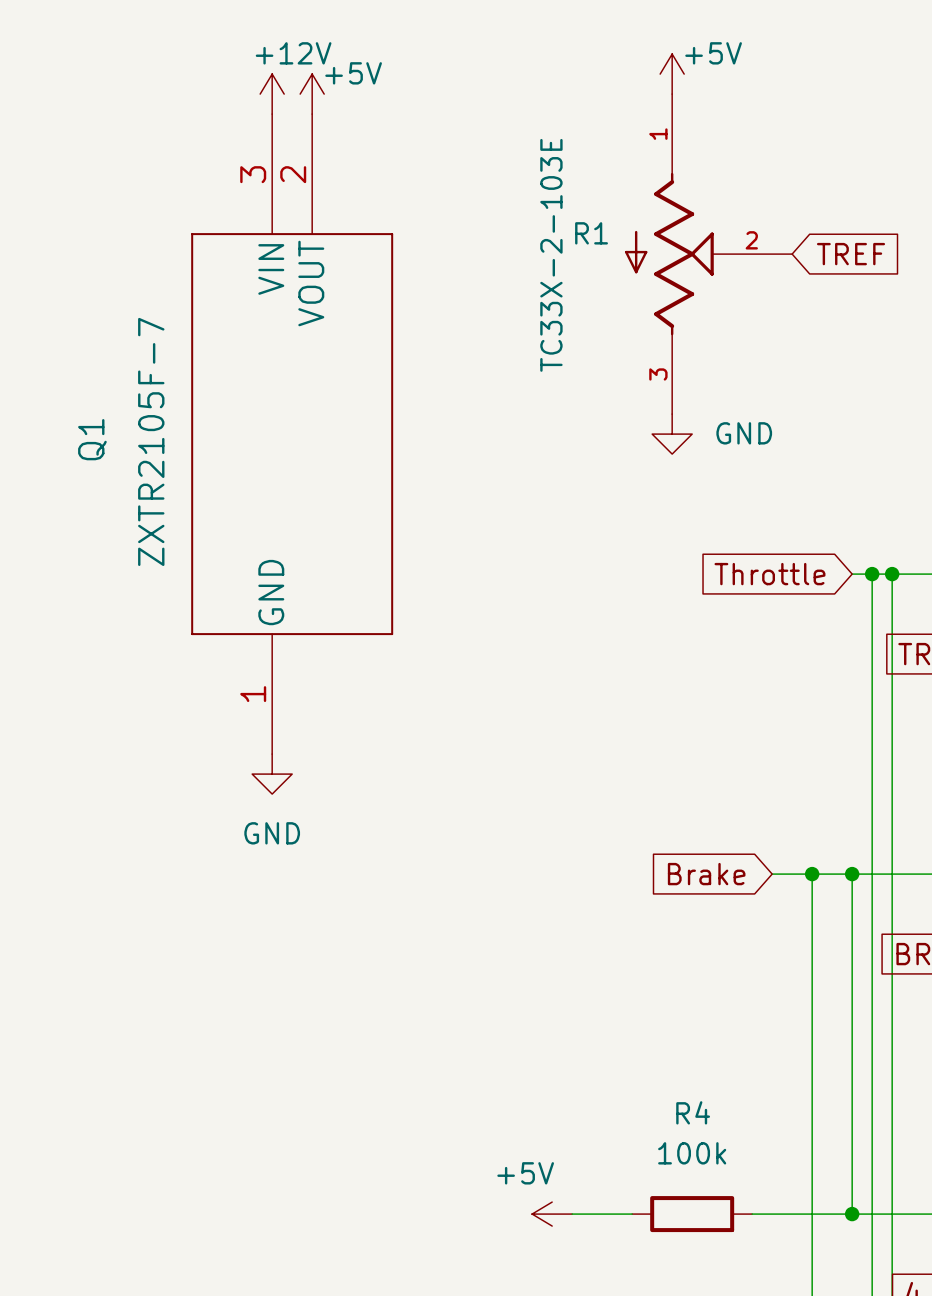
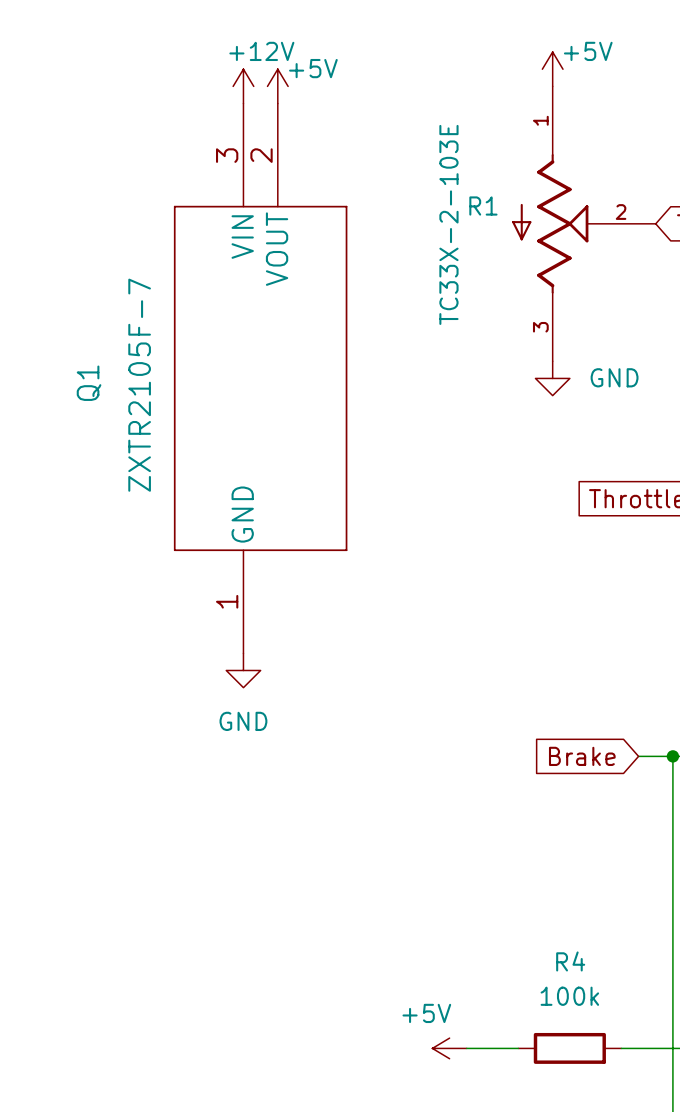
power symbol: +12V (272, 94) -> none
power symbol: +5V (312, 94) -> +12V (243, 86)
power symbol: none -> +5V (277, 86)
Q1 position: (292, 434) -> (260, 378)
power symbol position: GND (272, 774) -> GND (243, 670)

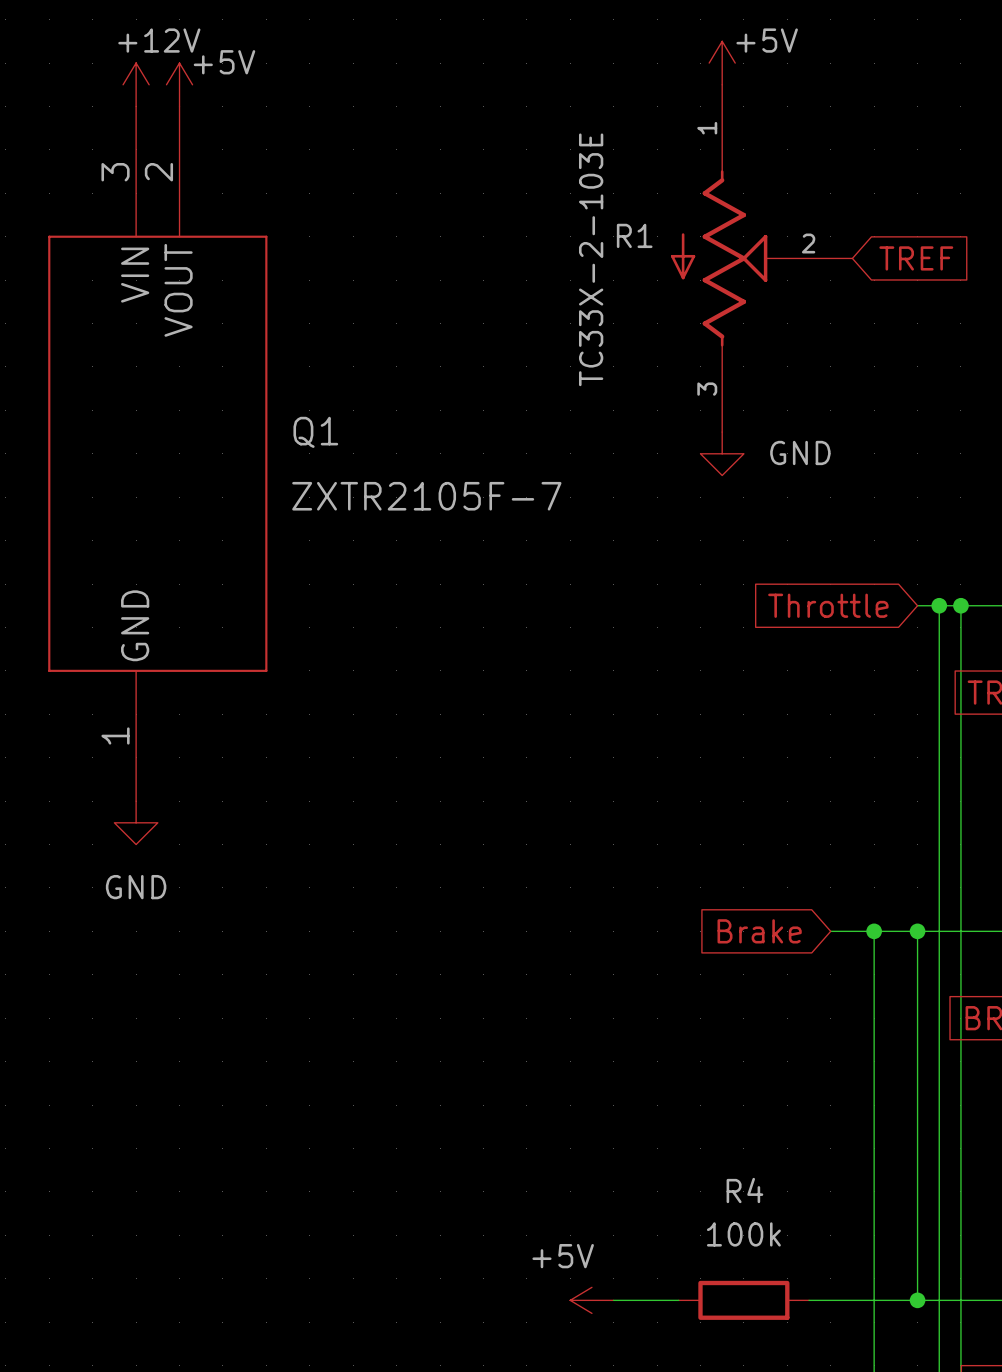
power symbol position: +12V (243, 86) -> +12V (136, 84)
power symbol position: +5V (277, 86) -> +5V (179, 84)
Q1 position: (260, 378) -> (157, 453)
Q1 name rotation: 0° (89, 383) -> 90° clockwise (315, 432)
Q1 name position: Q1 (89, 383) -> Q1 (315, 432)
Q1 value rotation: 0° (139, 385) -> 90° clockwise (426, 496)
power symbol position: GND (243, 670) -> GND (136, 822)

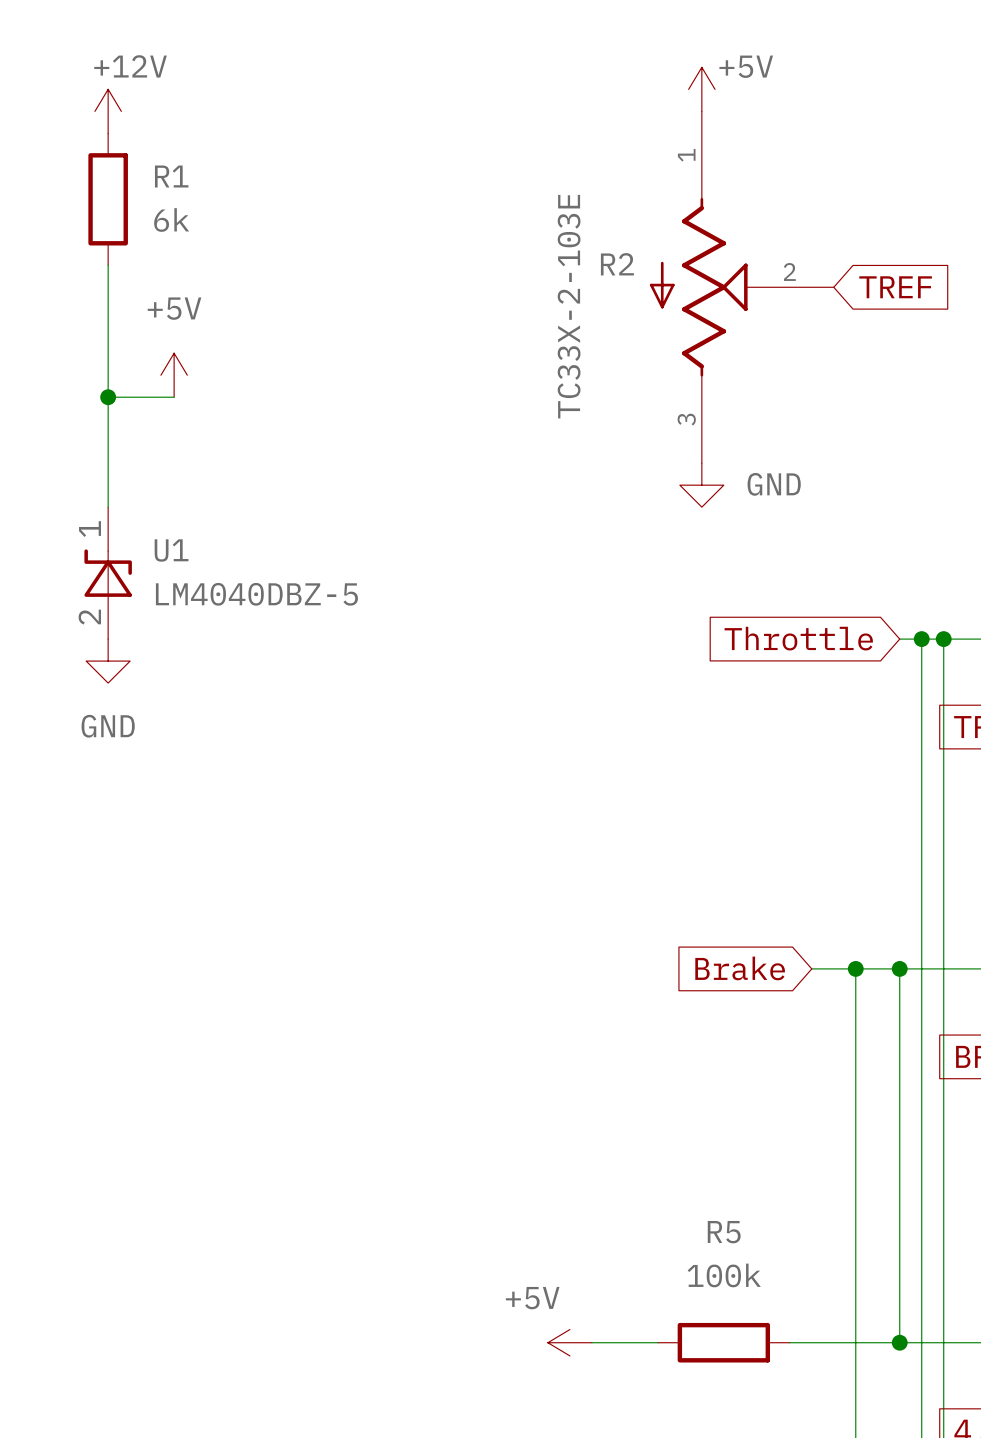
power symbol text position: +5V (224, 62) -> +5V (174, 308)
power symbol position: +5V (179, 84) -> +5V (174, 375)
R1: none -> 6k (108, 199)
R1 name: R1 (634, 235) -> R2 (617, 264)
wire: none -> (108, 265) (108, 507)
wire: none -> (108, 397) (174, 397)
junction: none -> (108, 397)
Q1: ZXTR2105F-7 (157, 453) -> none
U1: none -> LM4040DBZ-5 (108, 573)
power symbol position: GND (136, 822) -> GND (108, 661)
R4 name: R4 (744, 1190) -> R5 (724, 1232)

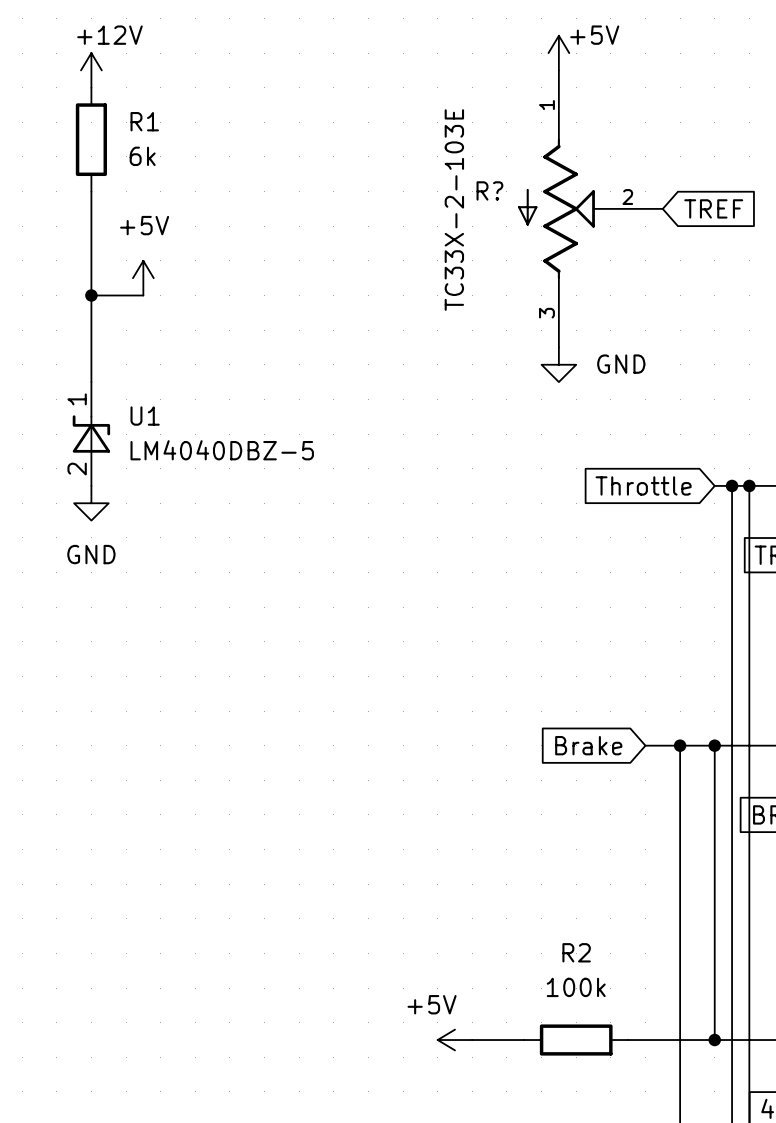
R2 name: R2 (617, 264) -> R? (489, 190)
R5 name: R5 (724, 1232) -> R2 (576, 952)

